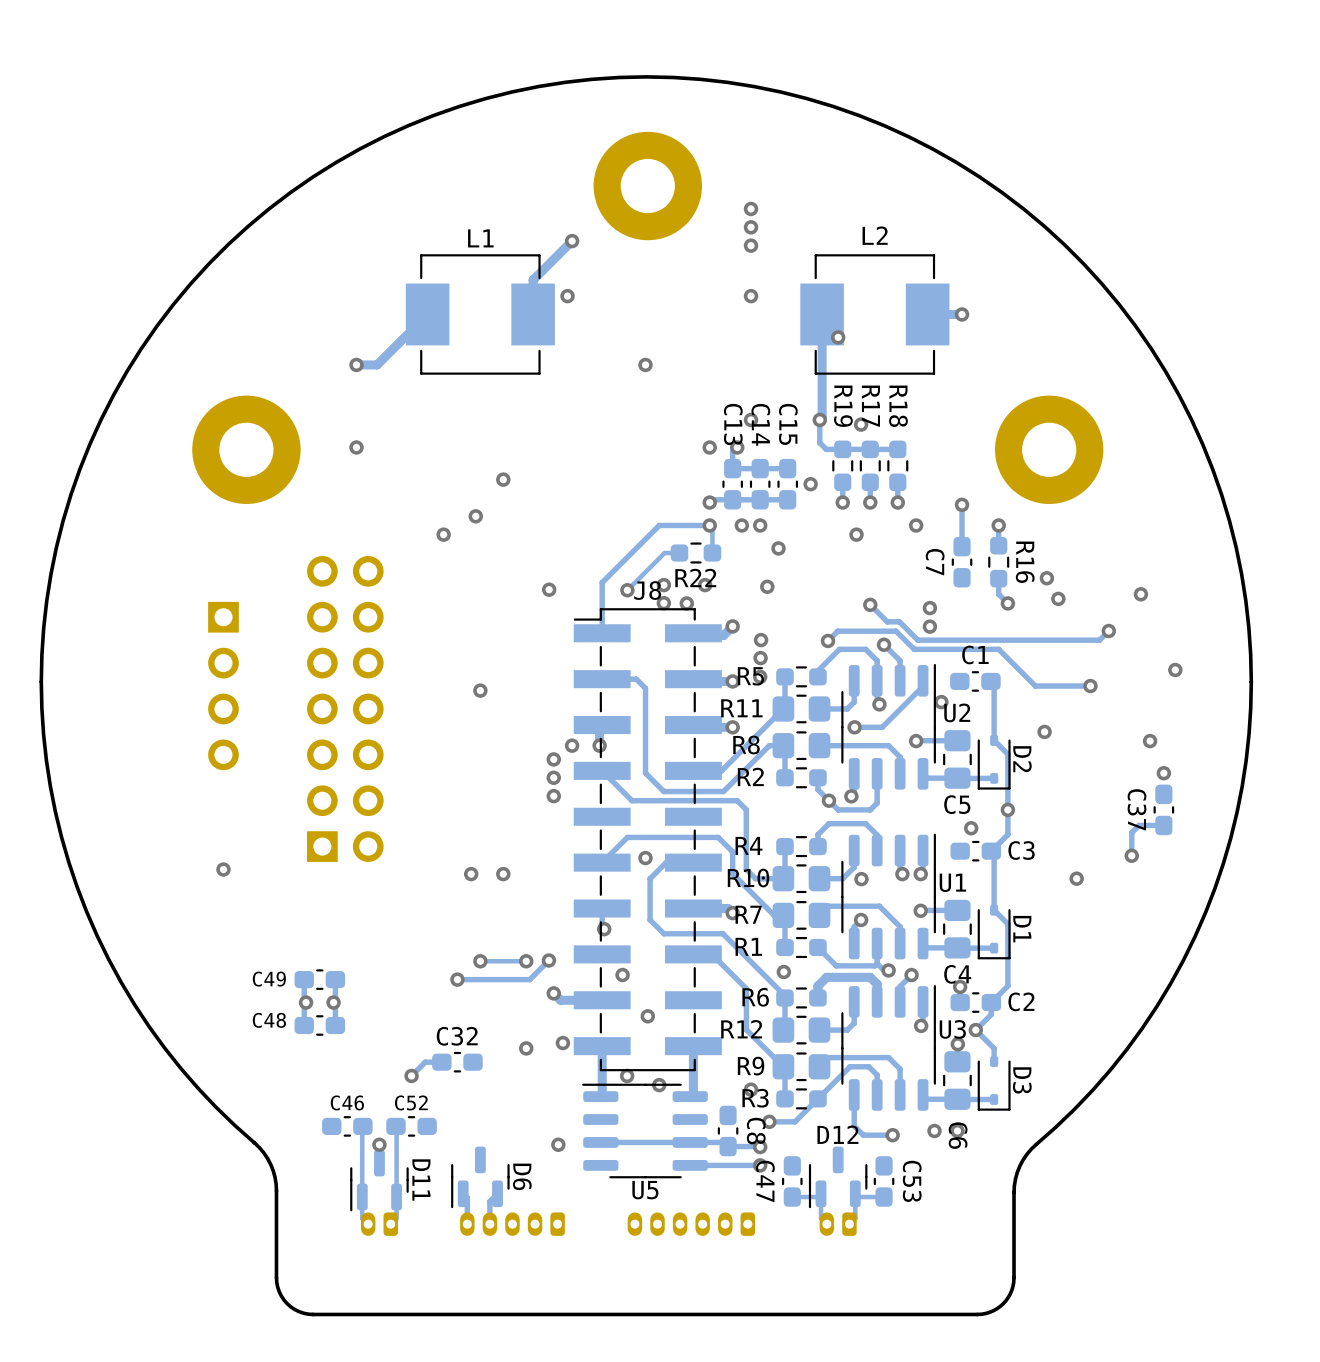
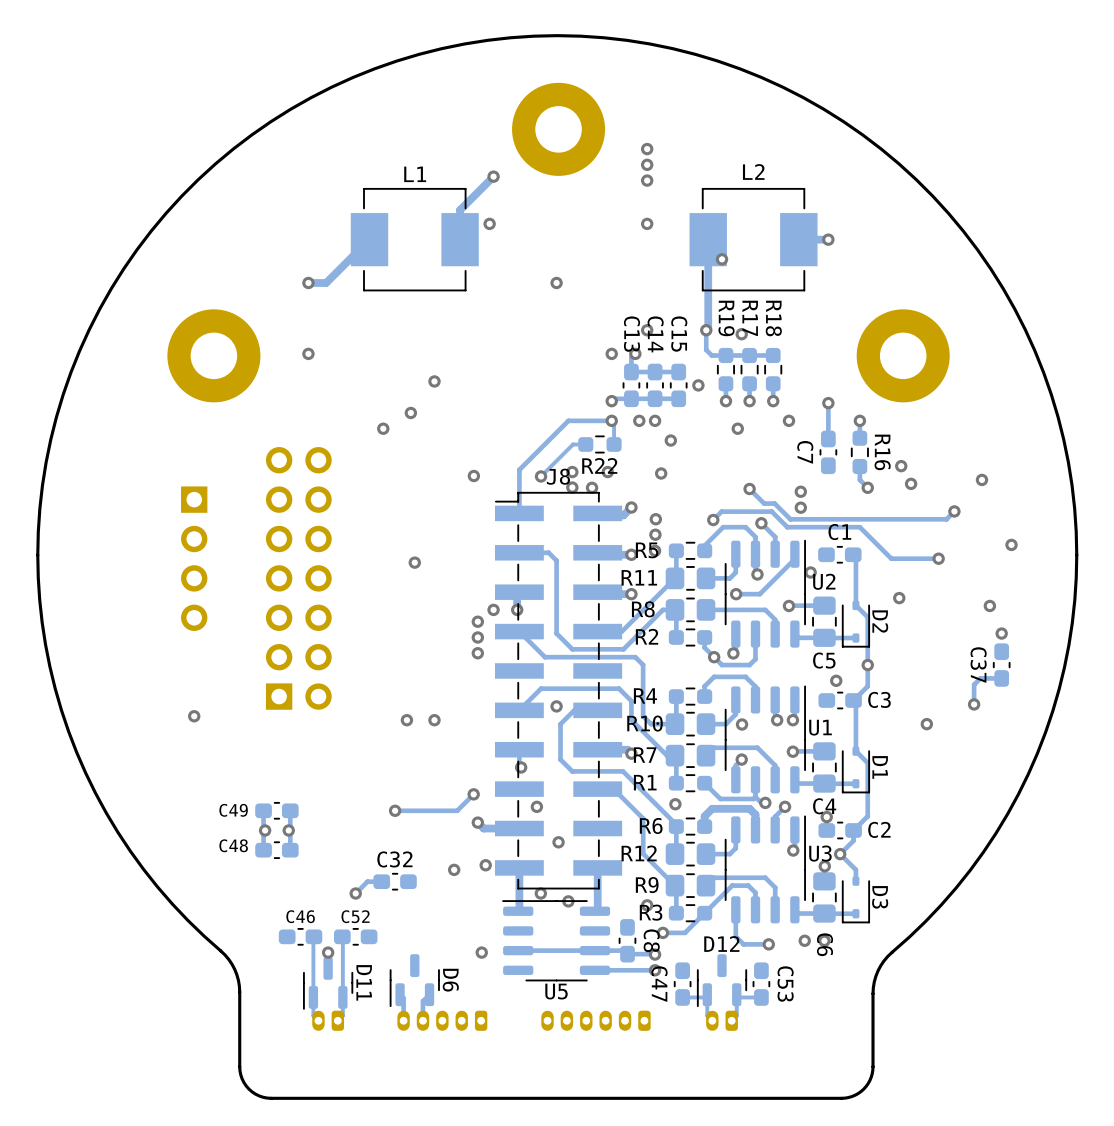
via: (480, 961) -> none
track: (526, 961) (480, 961) -> none
via: (526, 961) -> none

